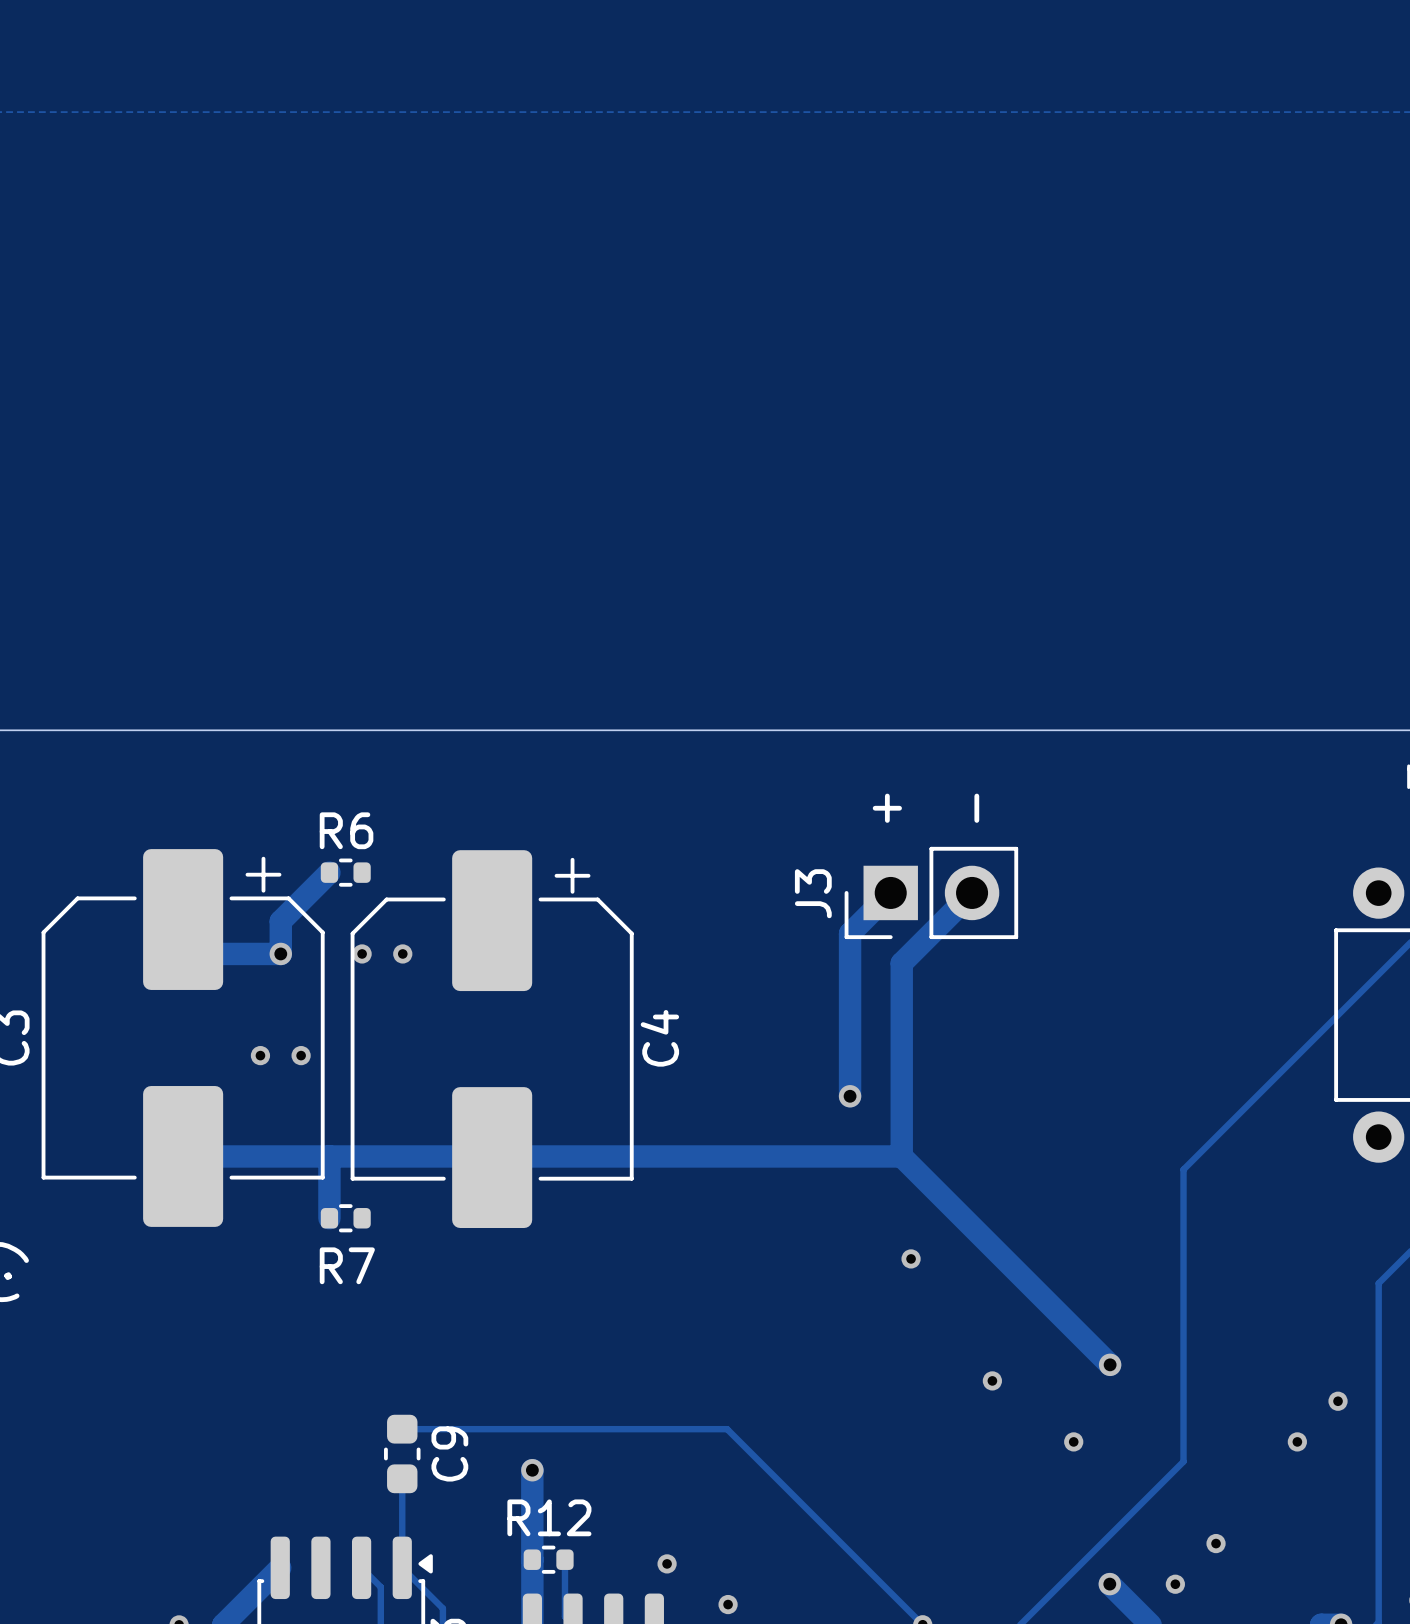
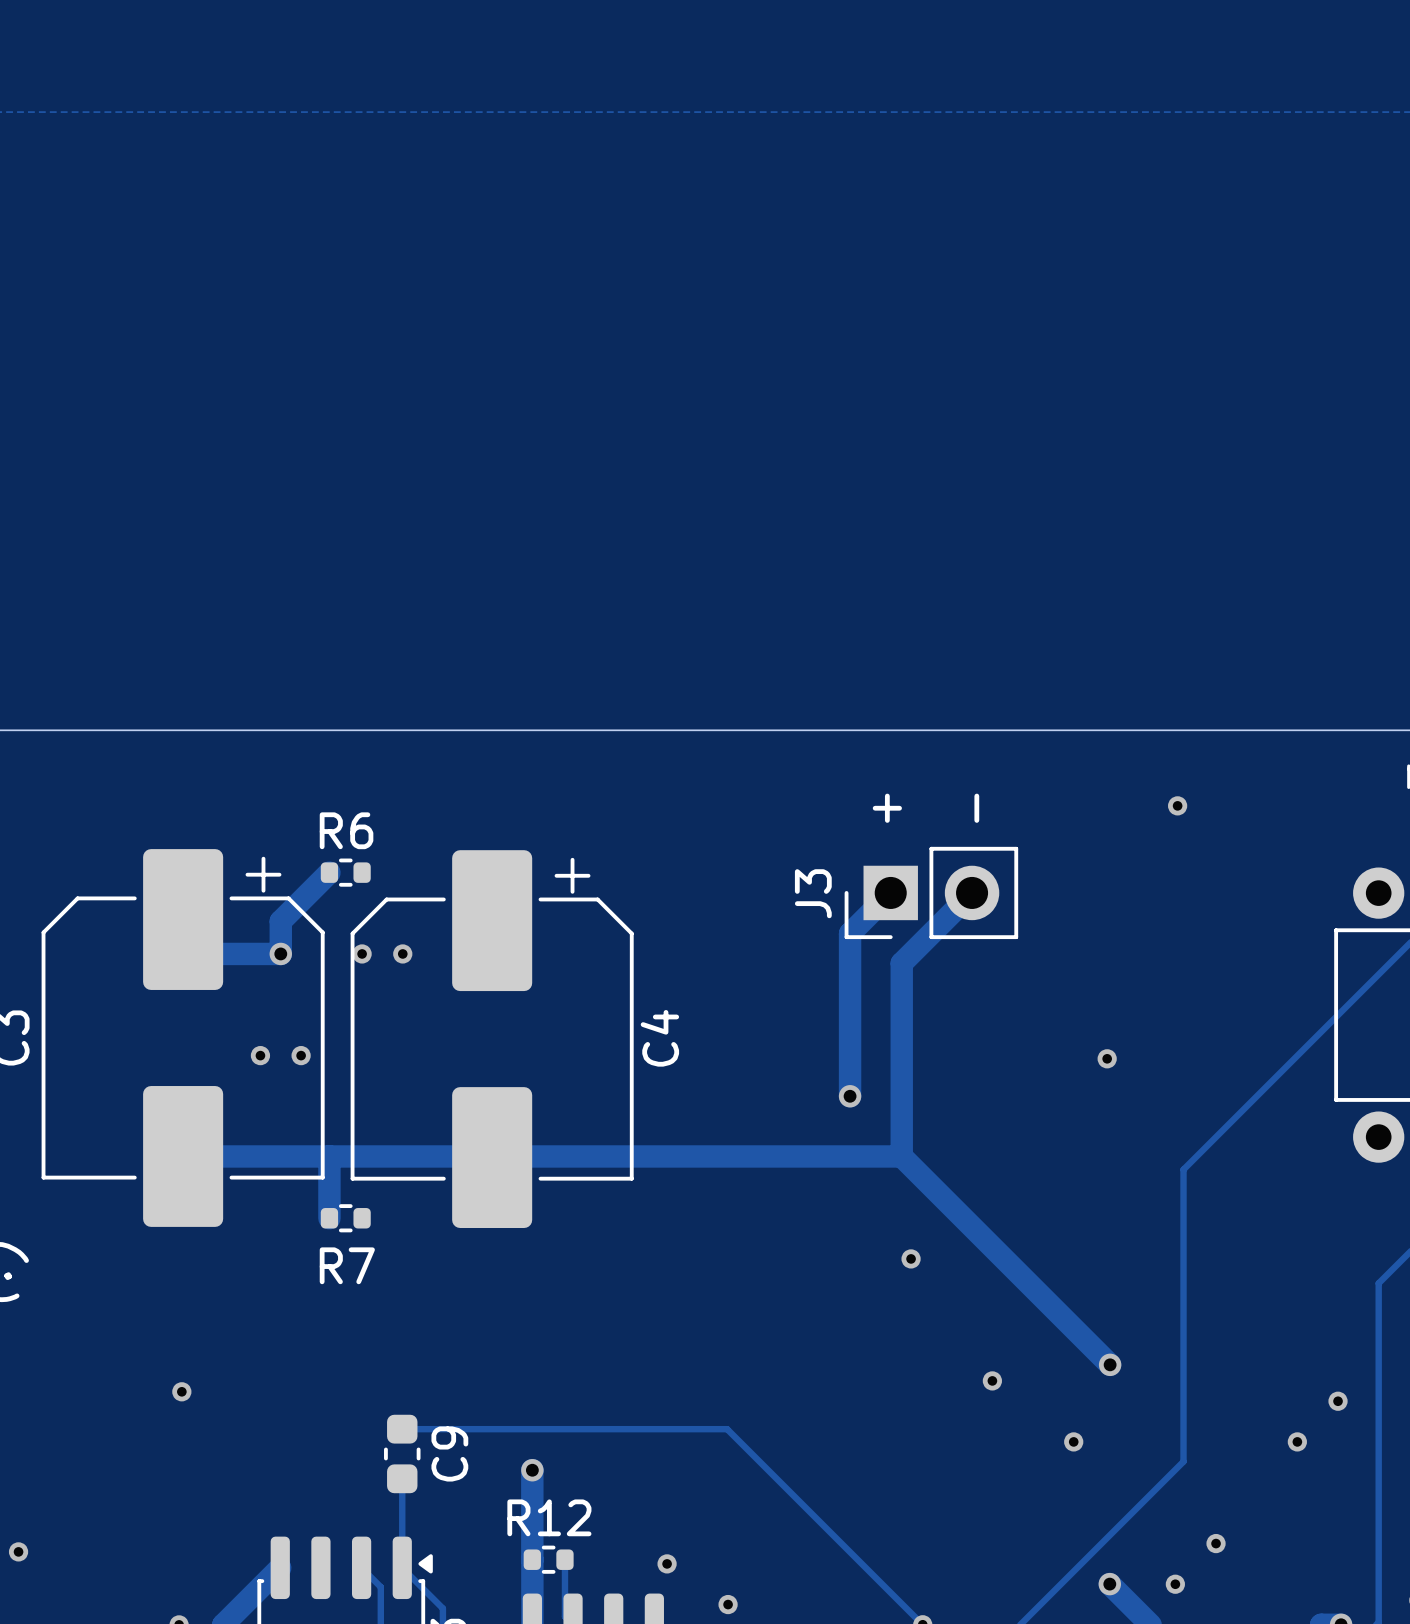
via: none -> (1177, 805)
via: none -> (1107, 1058)
via: none -> (181, 1391)
via: none -> (18, 1551)

